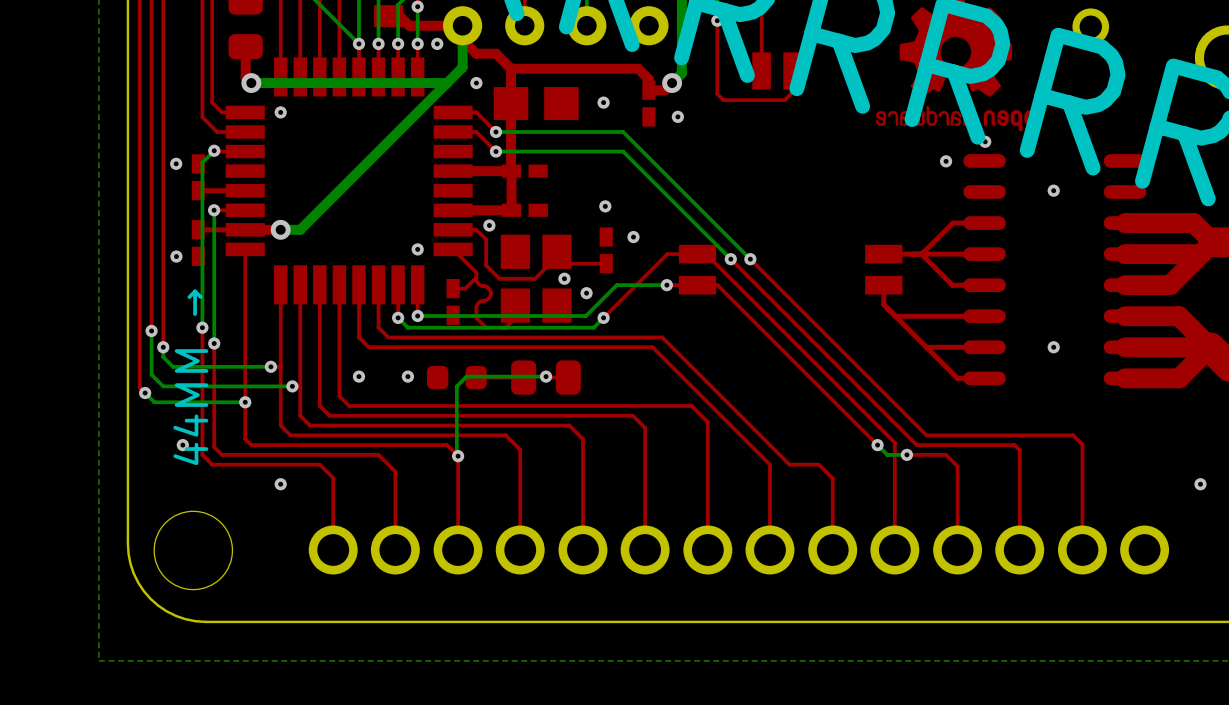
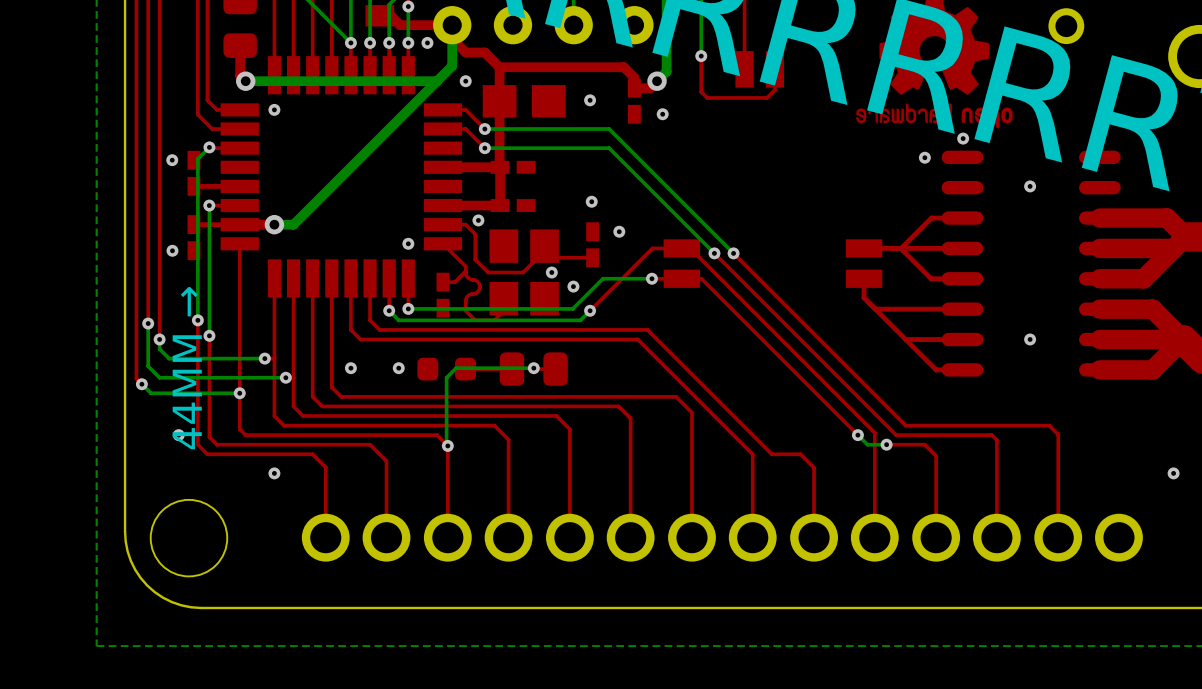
top track: (717, 20) (717, 57) -> none
bottom track: none -> (701, 20) (701, 56)
via position: (717, 20) -> (701, 56)

